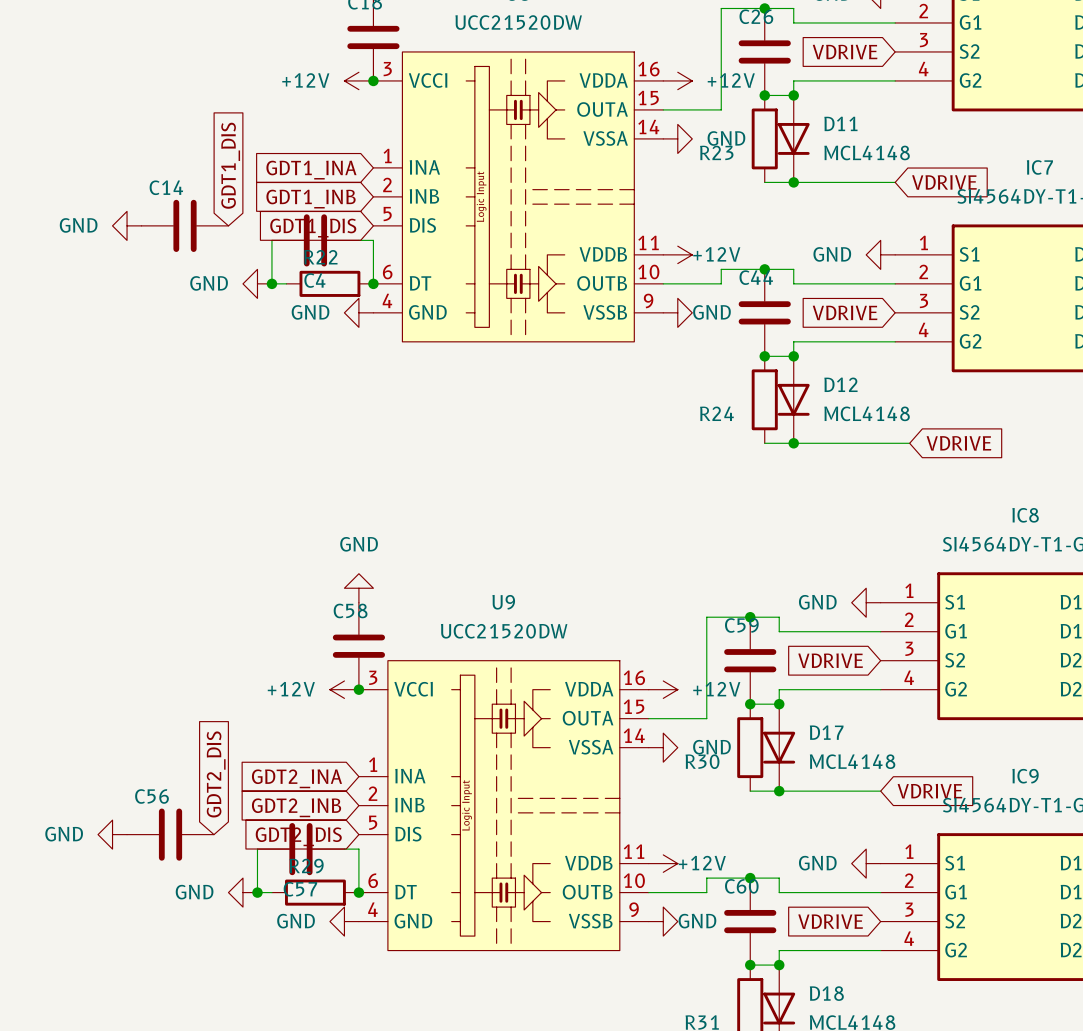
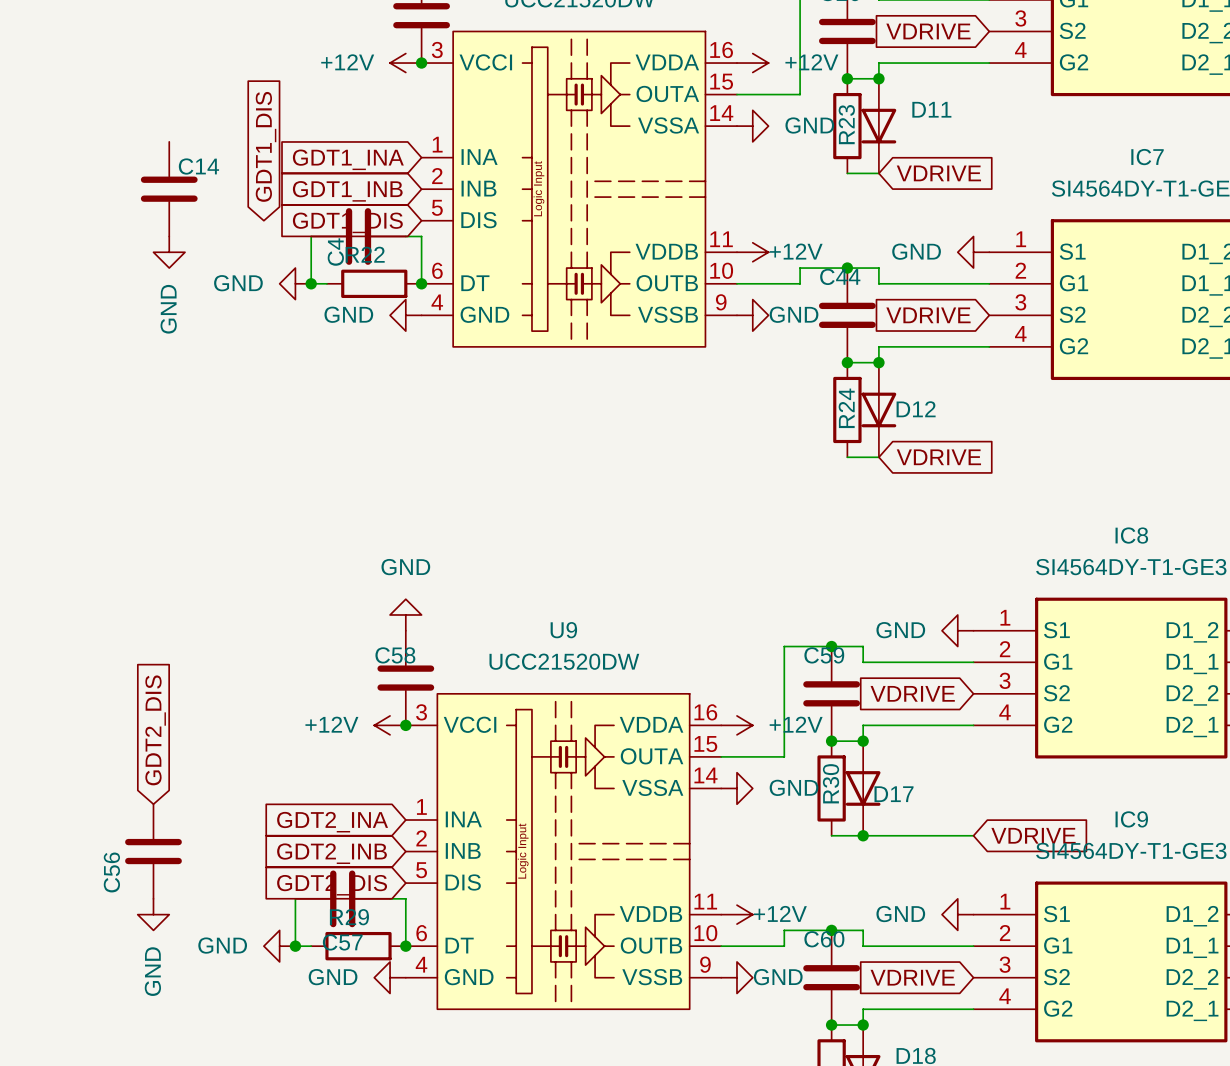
R23 name rotation: 0° (716, 152) -> 90° counterclockwise (846, 124)
R23 name position: R23 (716, 152) -> R23 (846, 124)
D11 value: MCL4148 (867, 152) -> none
wire: (793, 182) (895, 182) -> none
junction: (793, 182) -> none
global label position: VDRIVE (944, 182) -> VDRIVE (938, 173)
power symbol rotation: 0° (127, 225) -> 90° counterclockwise (169, 252)
power symbol position: GND (127, 225) -> GND (169, 252)
C14 rotation: 0° (185, 225) -> 90° clockwise (169, 189)
C14 position: (185, 225) -> (169, 189)
C4 name rotation: 0° (314, 280) -> 90° counterclockwise (335, 252)
D12 name position: D12 (840, 384) -> D12 (916, 409)
R24 name rotation: 0° (716, 413) -> 90° counterclockwise (846, 408)
R24 name position: R24 (716, 413) -> R24 (846, 408)
D12 value: MCL4148 (867, 413) -> none
wire: (793, 443) (909, 443) -> none
junction: (793, 443) -> none
global label position: VDRIVE (958, 443) -> VDRIVE (938, 457)
C58 name position: C58 (350, 610) -> C58 (395, 655)
D17 name position: D17 (826, 732) -> D17 (894, 794)
R30 name rotation: 0° (702, 761) -> 90° counterclockwise (831, 783)
R30 name position: R30 (702, 761) -> R30 (831, 783)
D17 value: MCL4148 (852, 761) -> none
global label position: GDT2_DIS (216, 774) -> GDT2_DIS (155, 730)
C56 name position: C56 (151, 796) -> C56 (111, 872)
power symbol rotation: 0° (112, 834) -> 90° counterclockwise (153, 914)
power symbol position: GND (112, 834) -> GND (153, 914)
C56 rotation: 0° (170, 834) -> 90° clockwise (153, 851)
C56 position: (170, 834) -> (153, 851)

